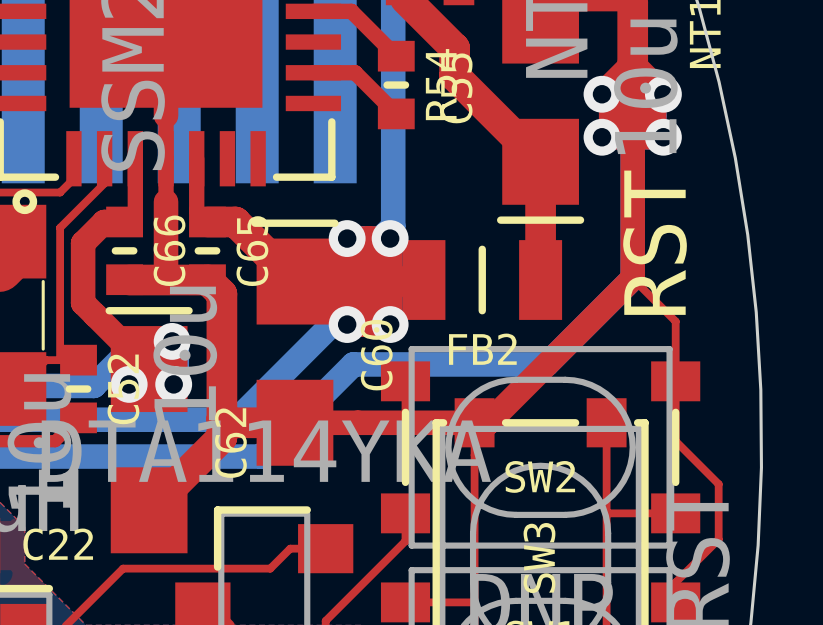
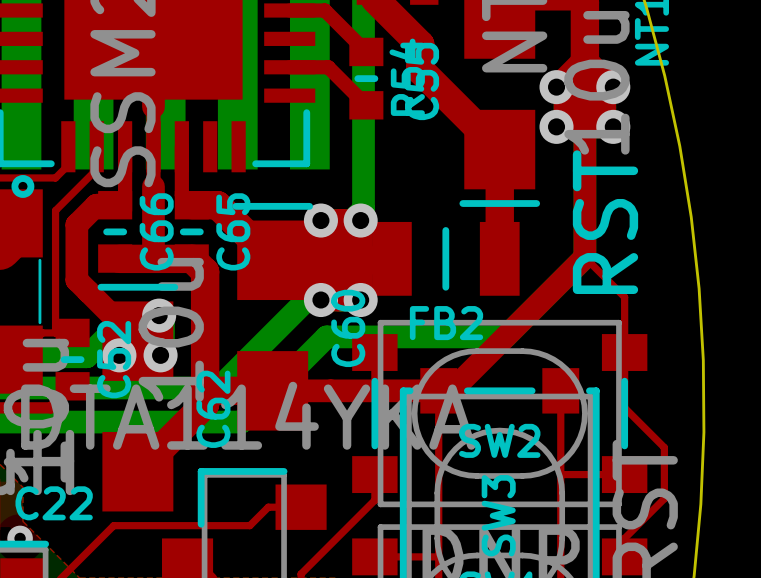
via: none -> (20, 538)

